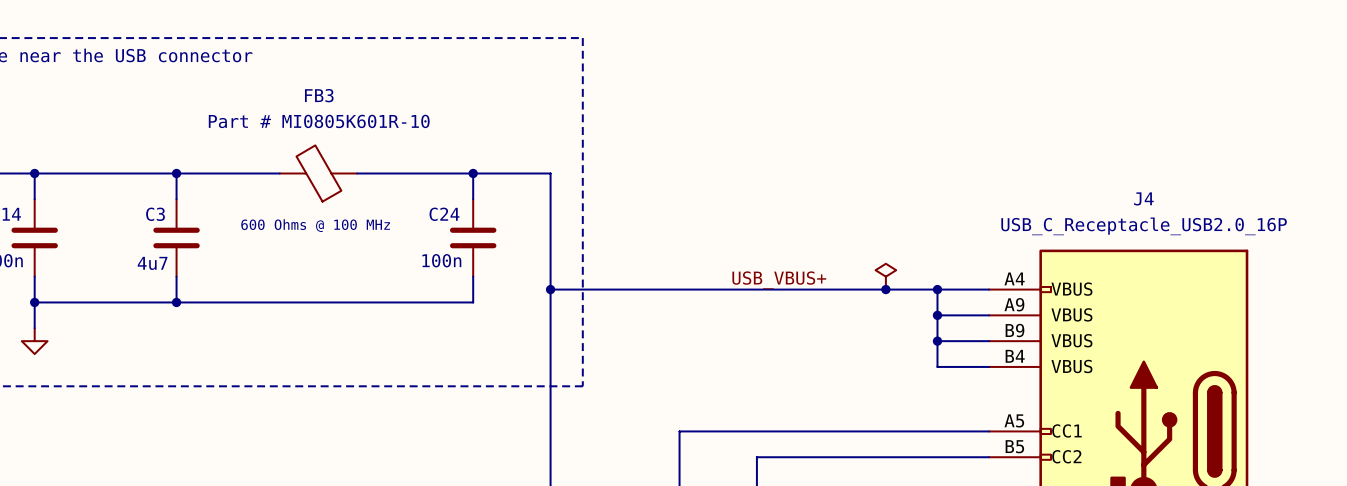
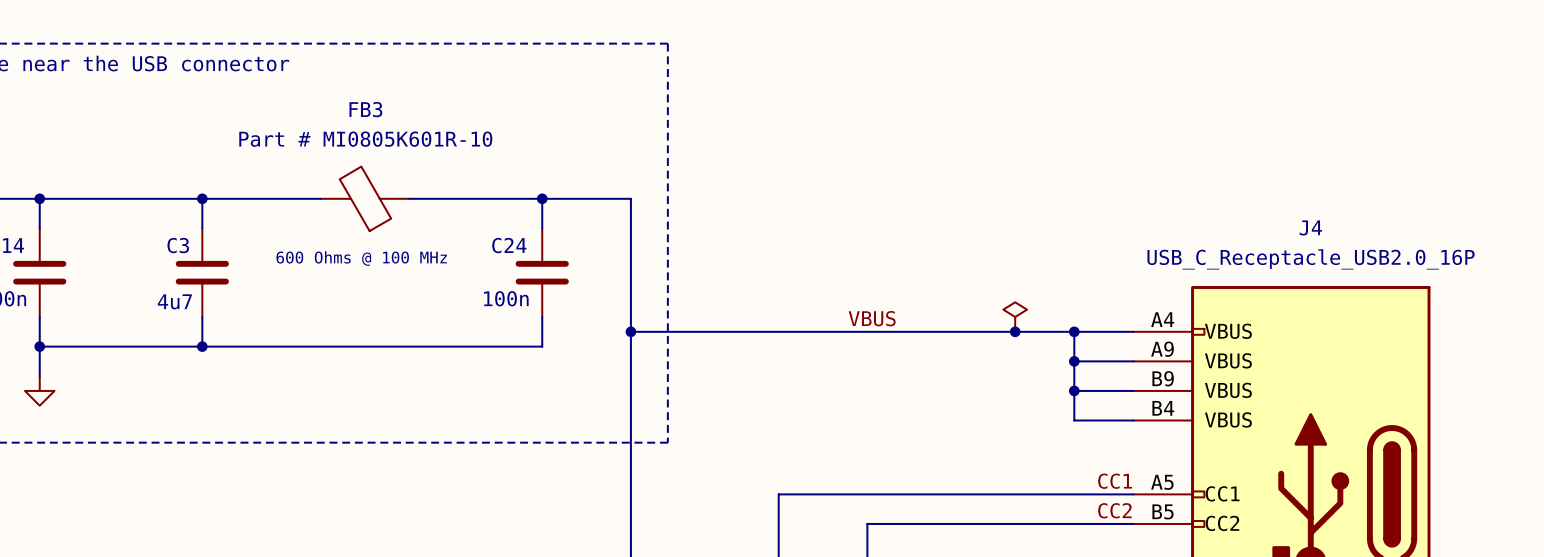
label: USB_VBUS+ (779, 280) -> VBUS (872, 318)
label: none -> CC1 (1115, 481)
label: none -> CC2 (1114, 510)

